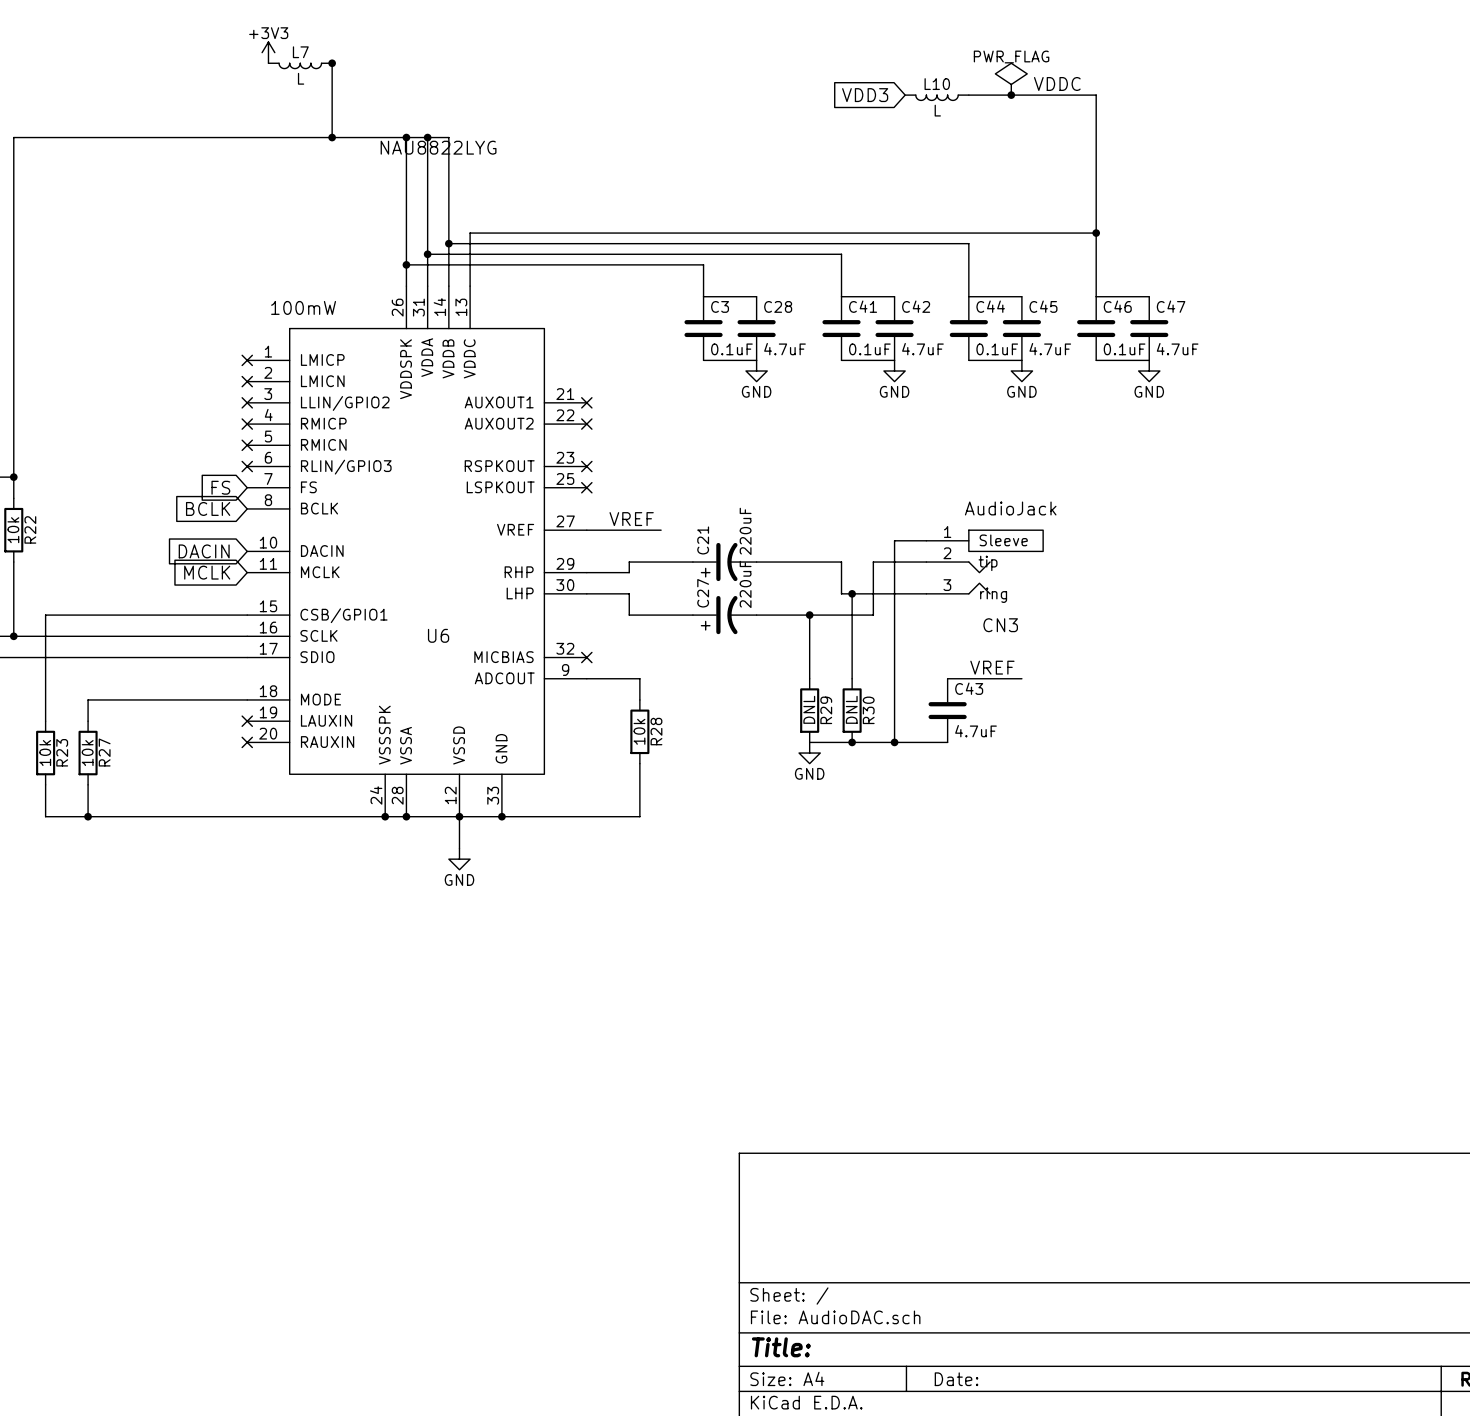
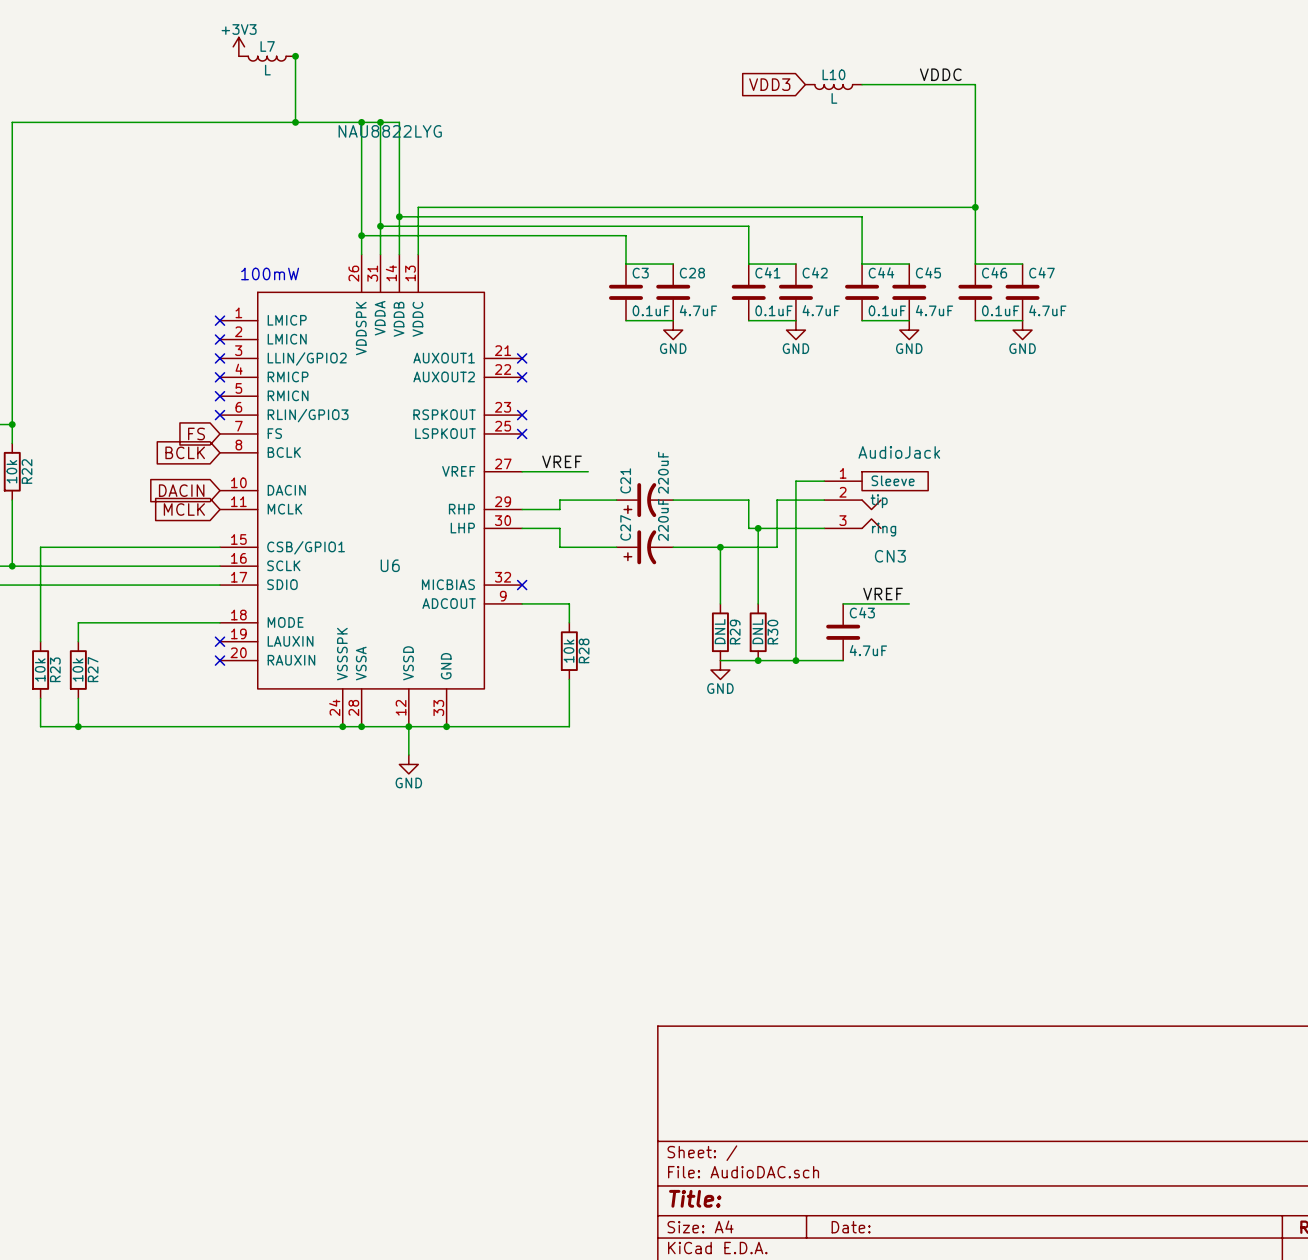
power symbol: PWR_FLAG (1011, 79) -> none
junction: (1011, 95) -> none

